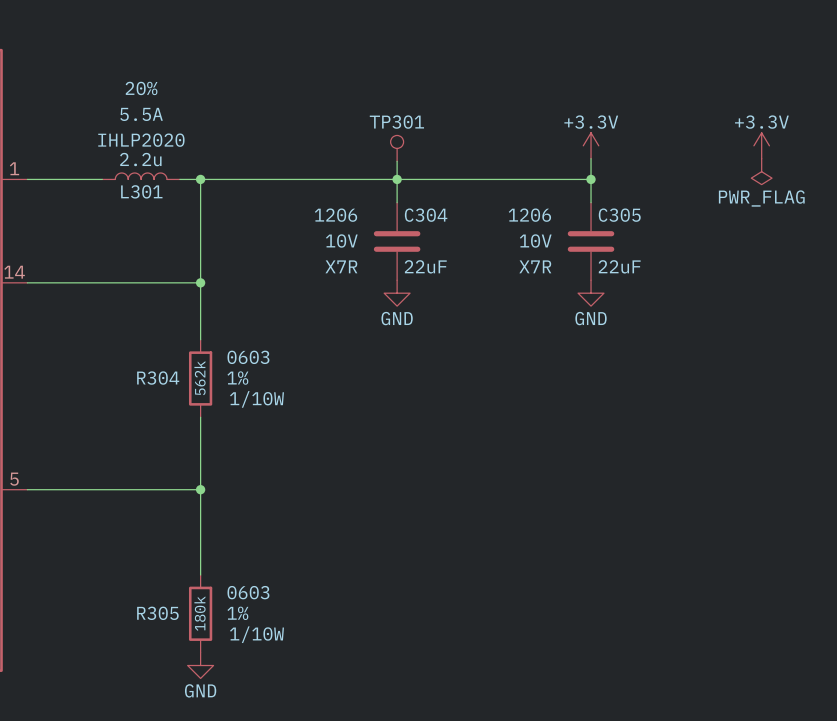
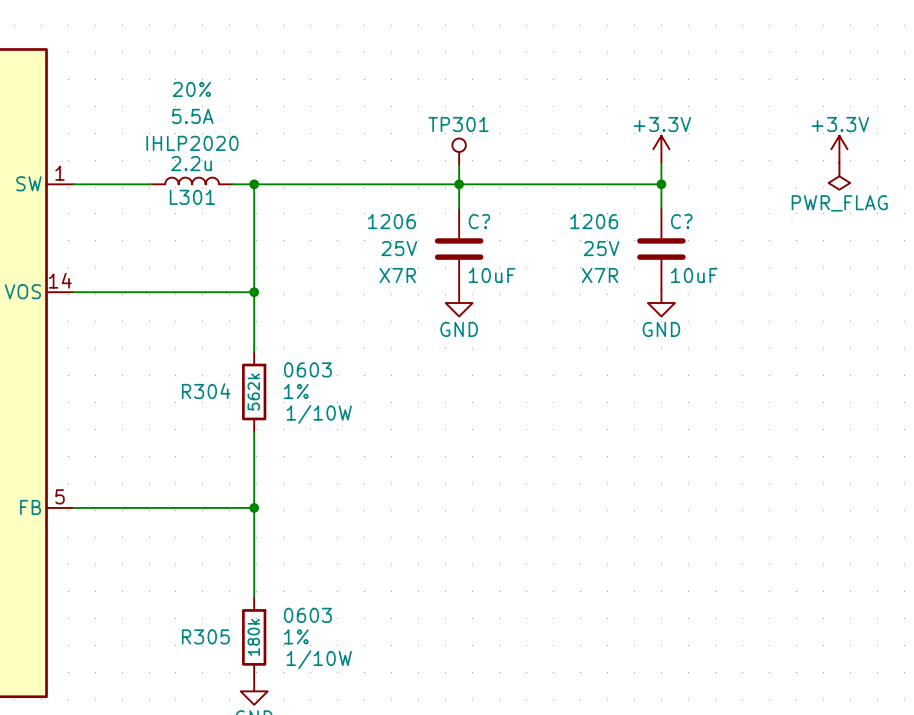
C304 name: C304 (426, 215) -> C? (479, 221)
C305 name: C305 (619, 215) -> C? (681, 221)
C304 text: 10V (341, 241) -> 25V (399, 248)
C305 text: 10V (535, 241) -> 25V (601, 248)
C304 value: 22uF (425, 266) -> 10uF (491, 275)
C305 value: 22uF (619, 266) -> 10uF (694, 275)

